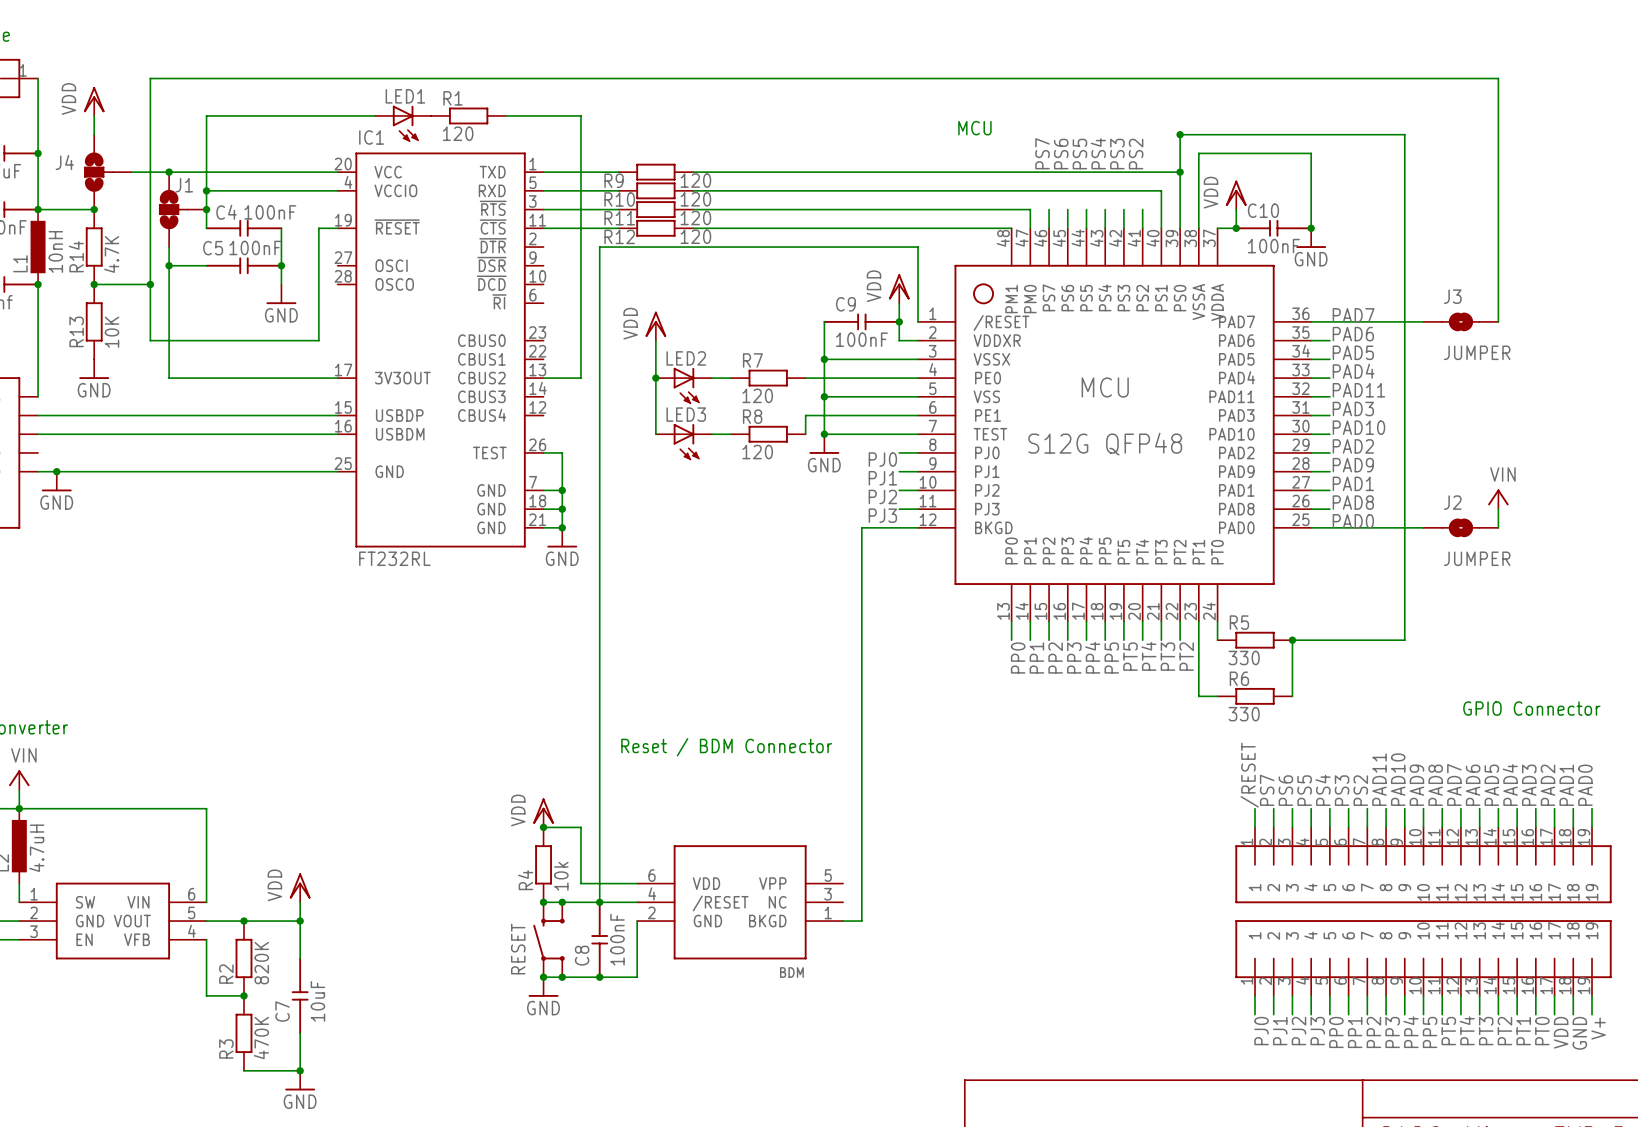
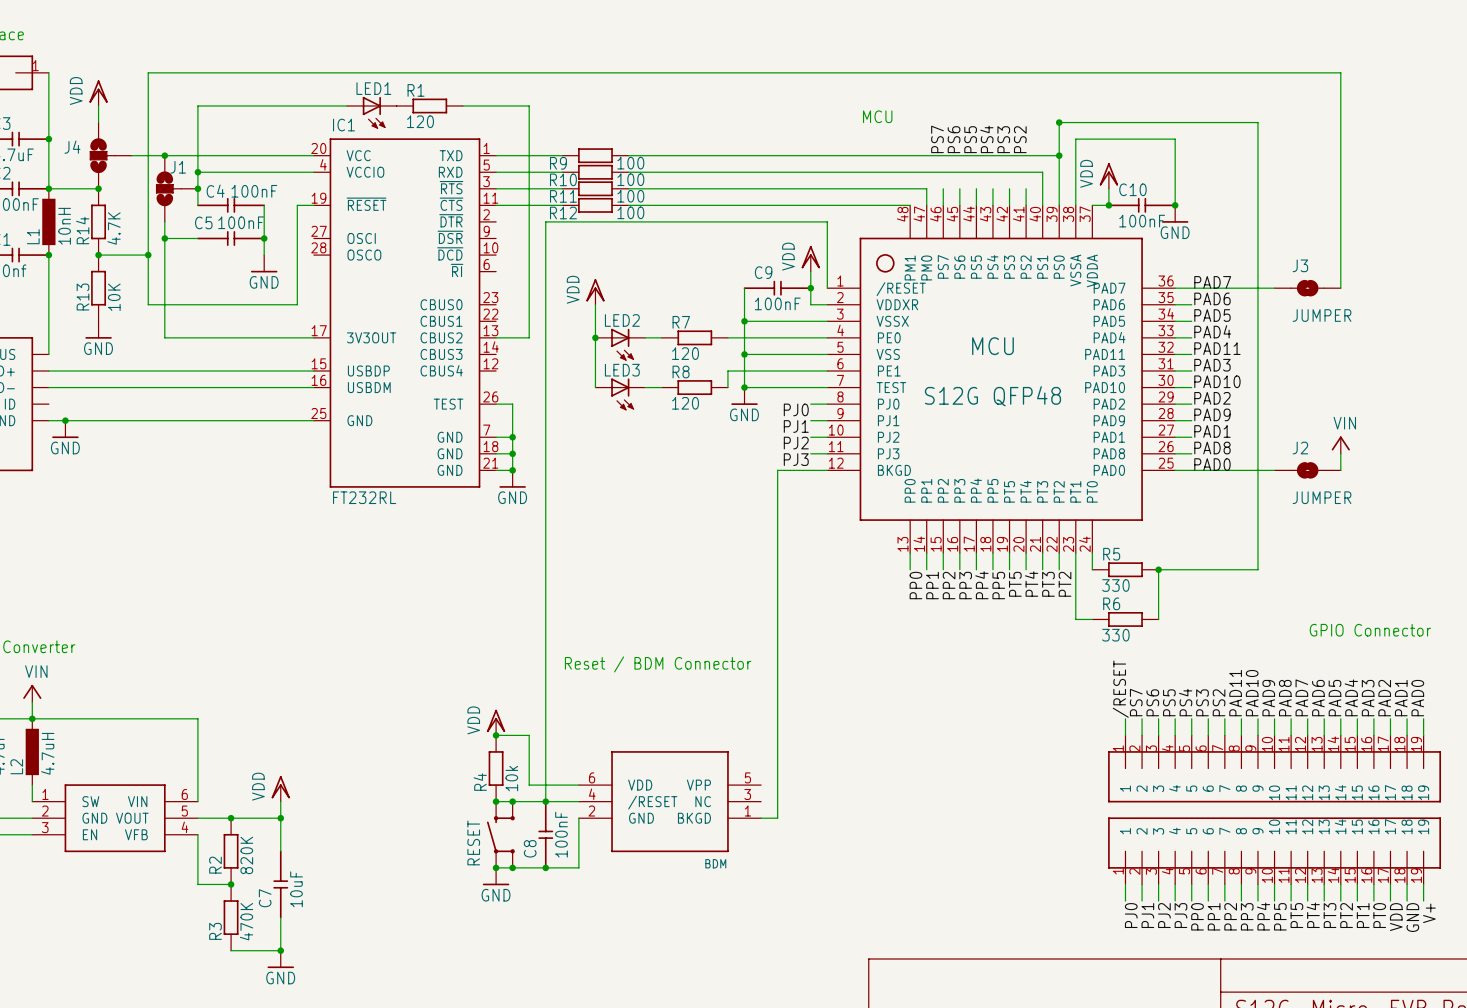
R9 value: 120 (695, 180) -> 100 (630, 163)
R10 value: 120 (695, 199) -> 100 (630, 179)
R11 value: 120 (695, 218) -> 100 (630, 196)
R12 value: 120 (695, 236) -> 100 (630, 212)

